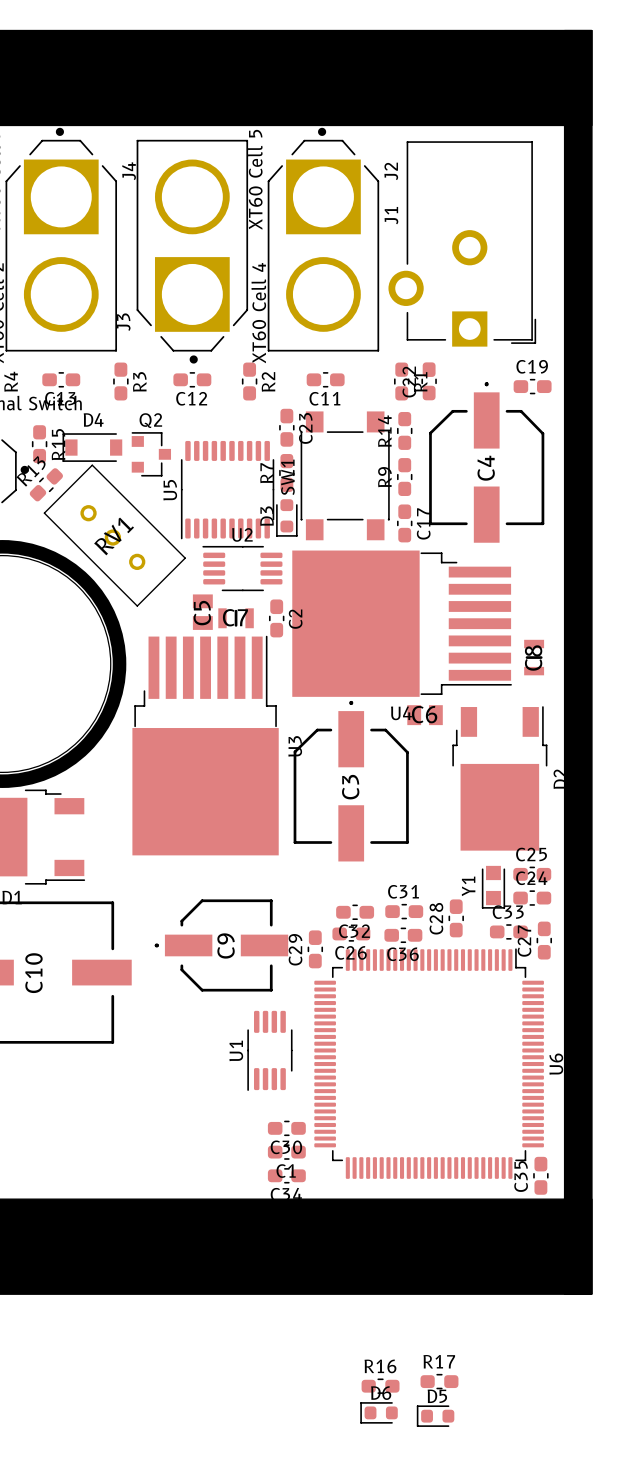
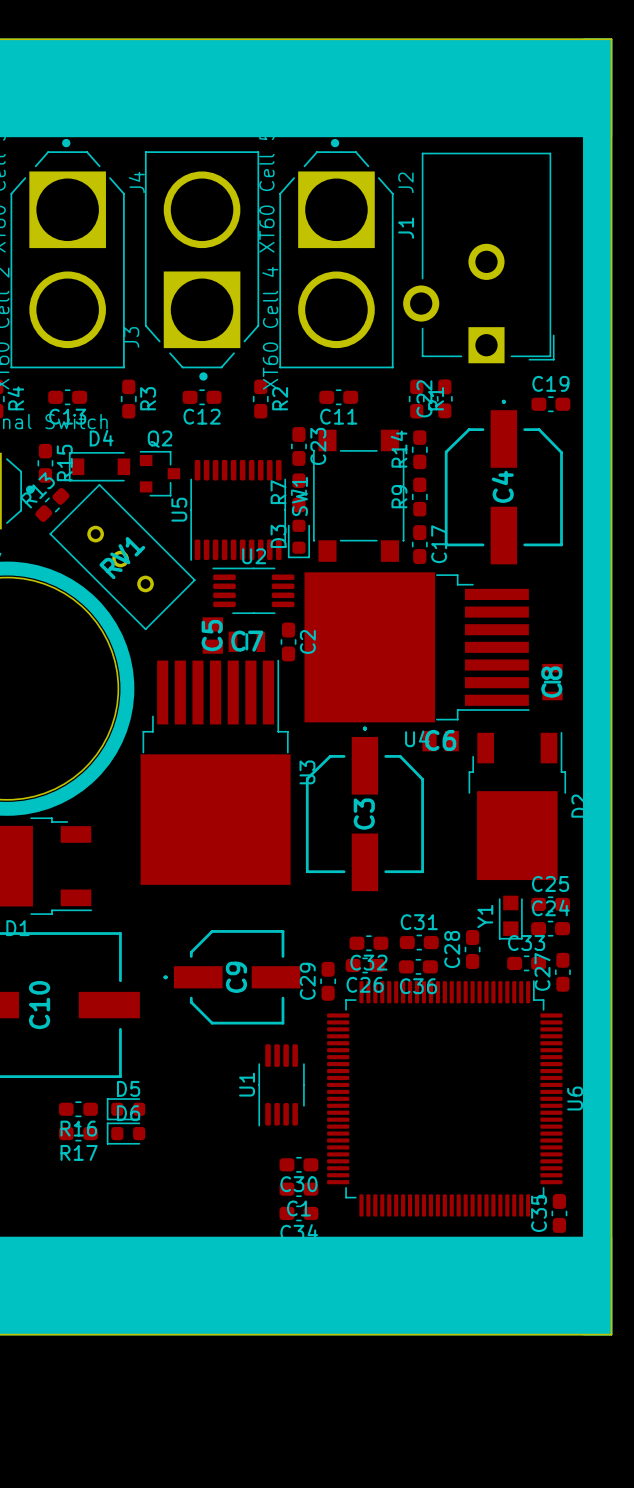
R17 name position: R17 (439, 1361) -> R17 (79, 1152)
R16 name position: R16 (380, 1366) -> R16 (78, 1128)
R17 position: (439, 1381) -> (78, 1133)
R16 position: (380, 1386) -> (78, 1109)
D6 position: (379, 1412) -> (126, 1133)
D5 position: (435, 1416) -> (126, 1109)

